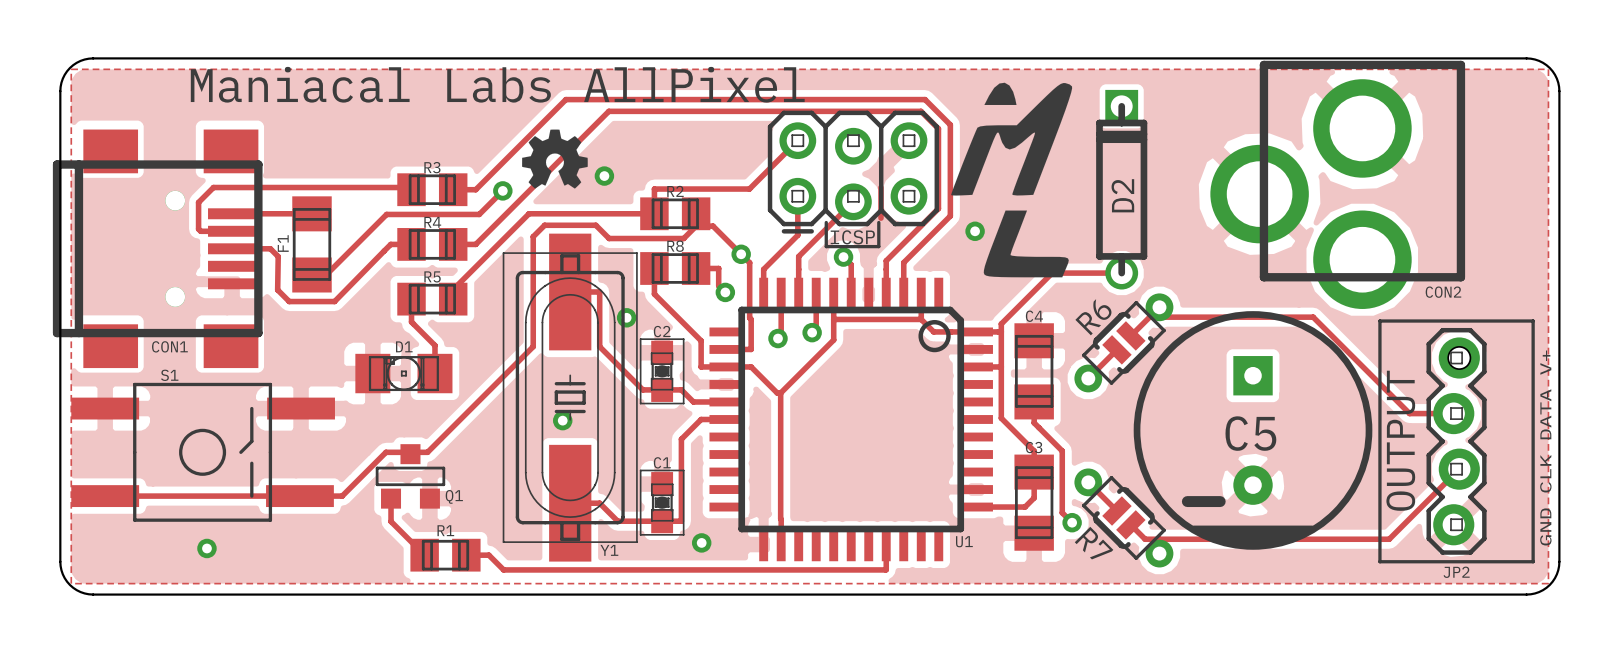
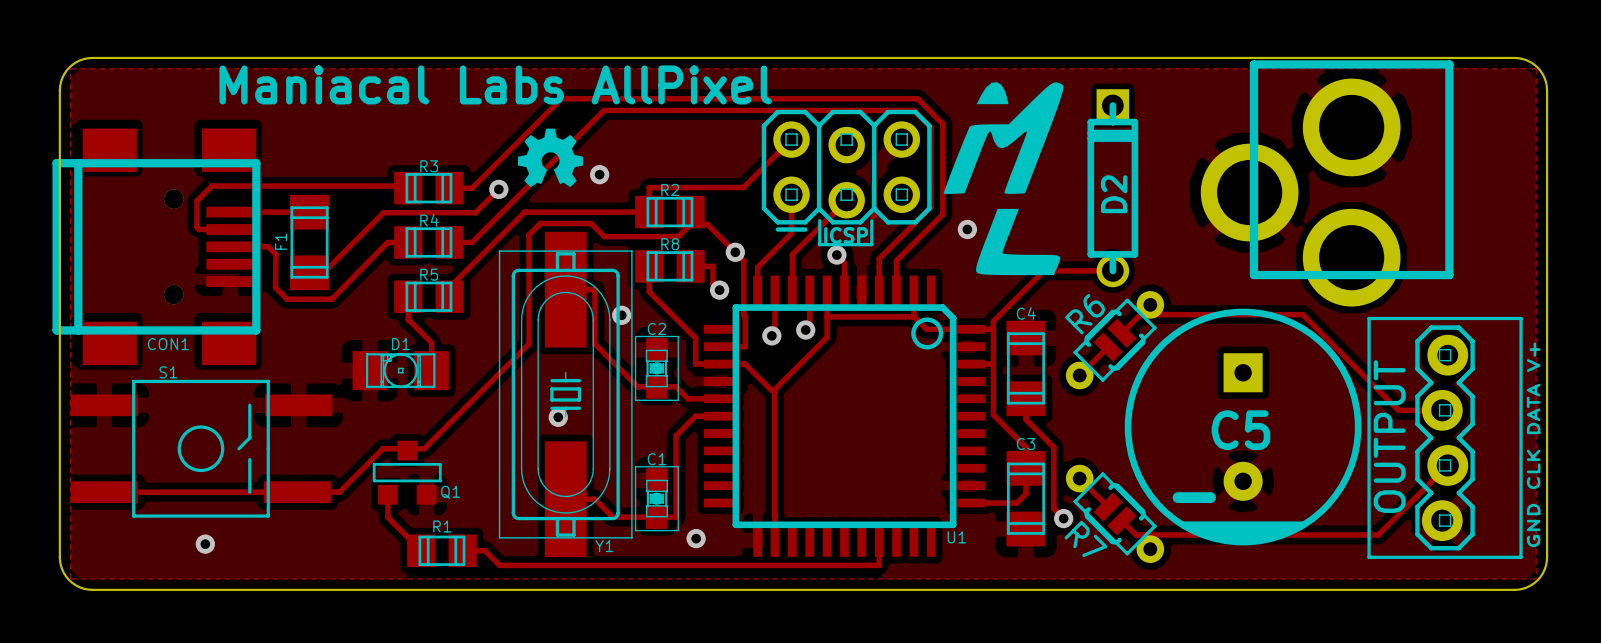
CON2 name: CON2 (1443, 292) -> none
JP2 name: JP2 (1456, 572) -> none

